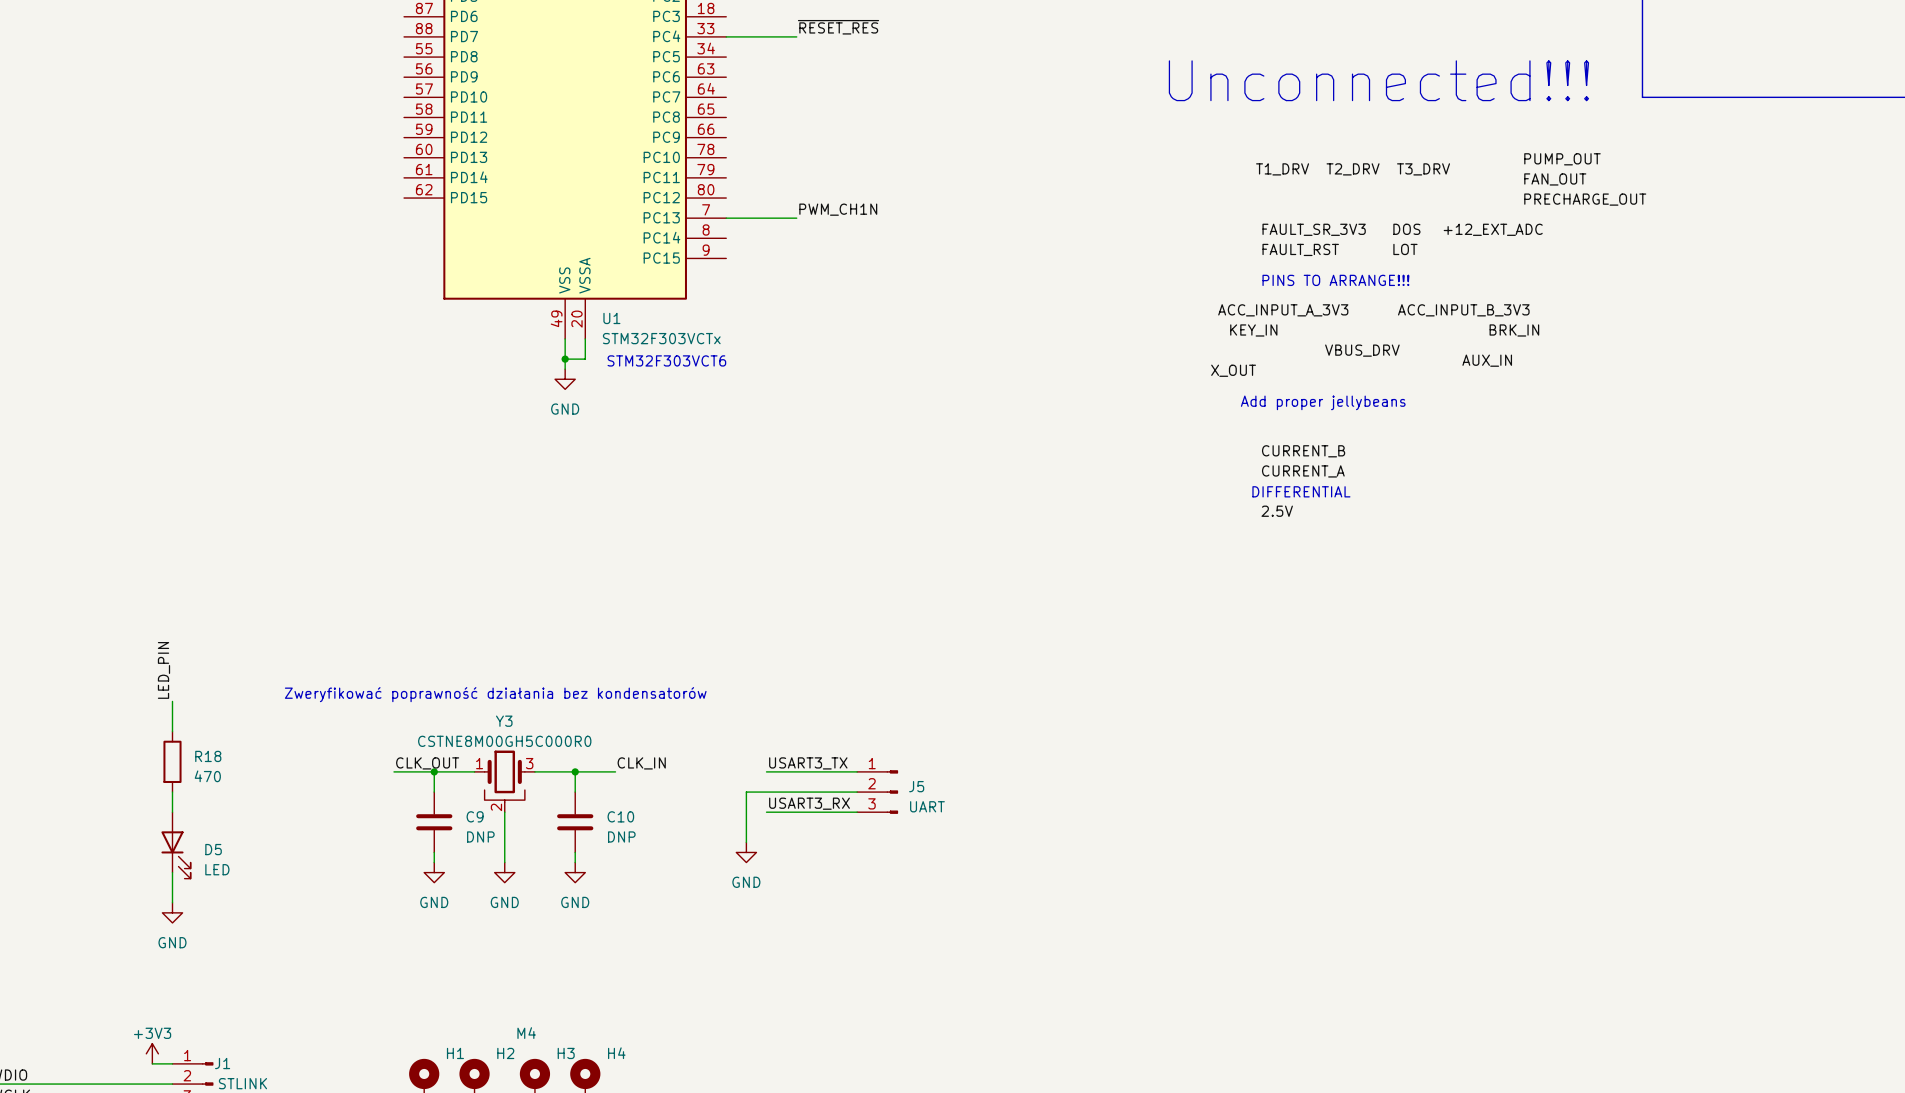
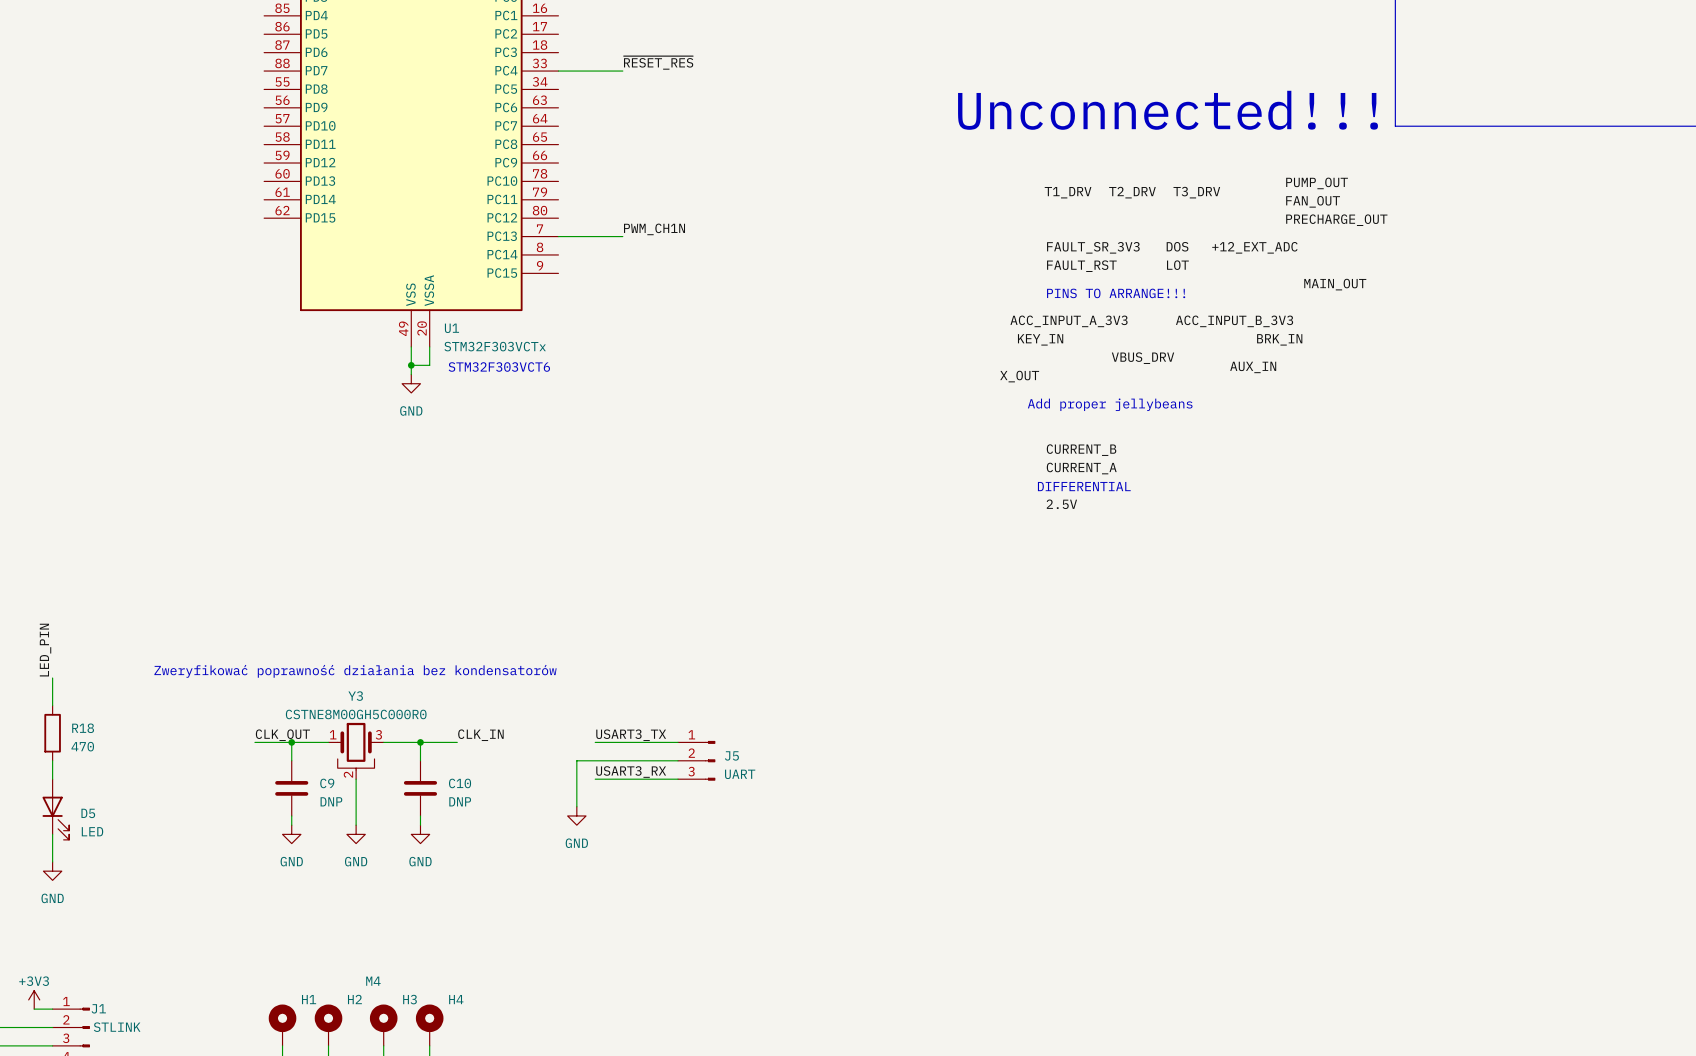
label: none -> MAIN_OUT (1335, 284)

